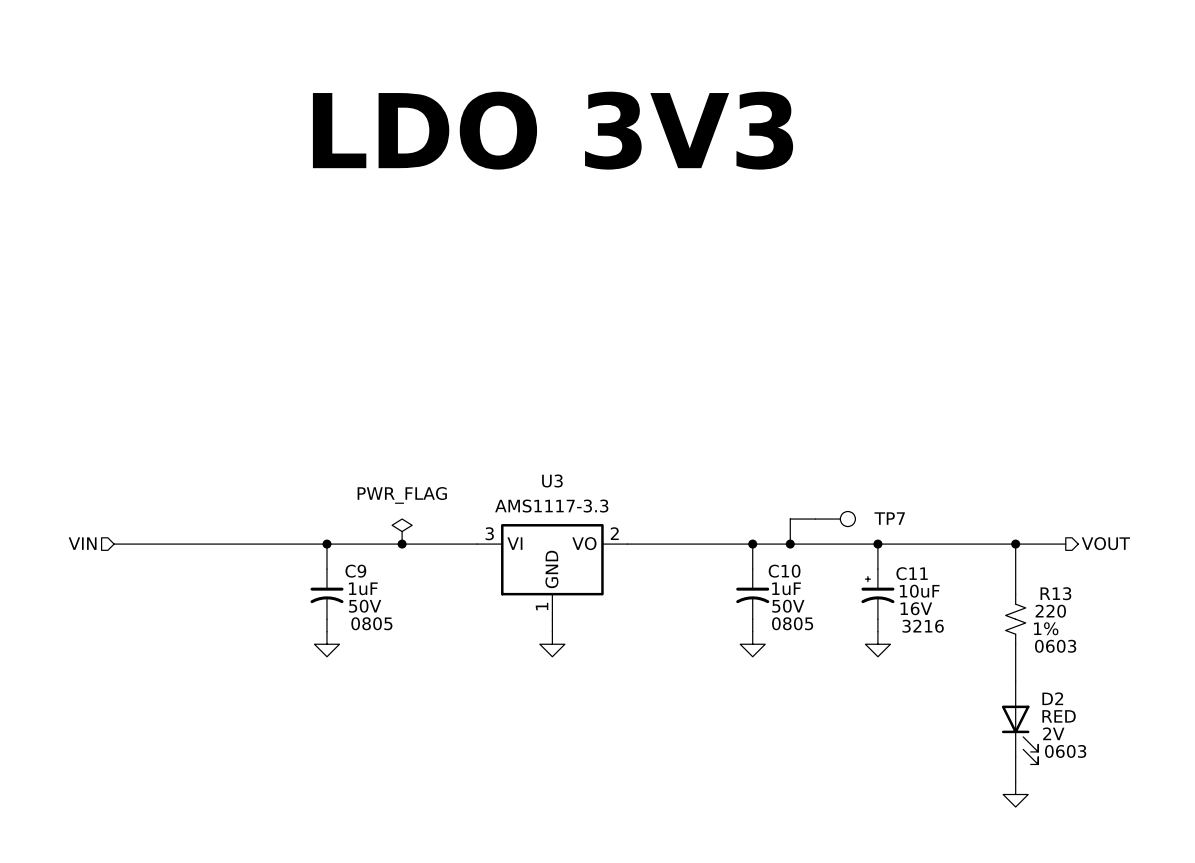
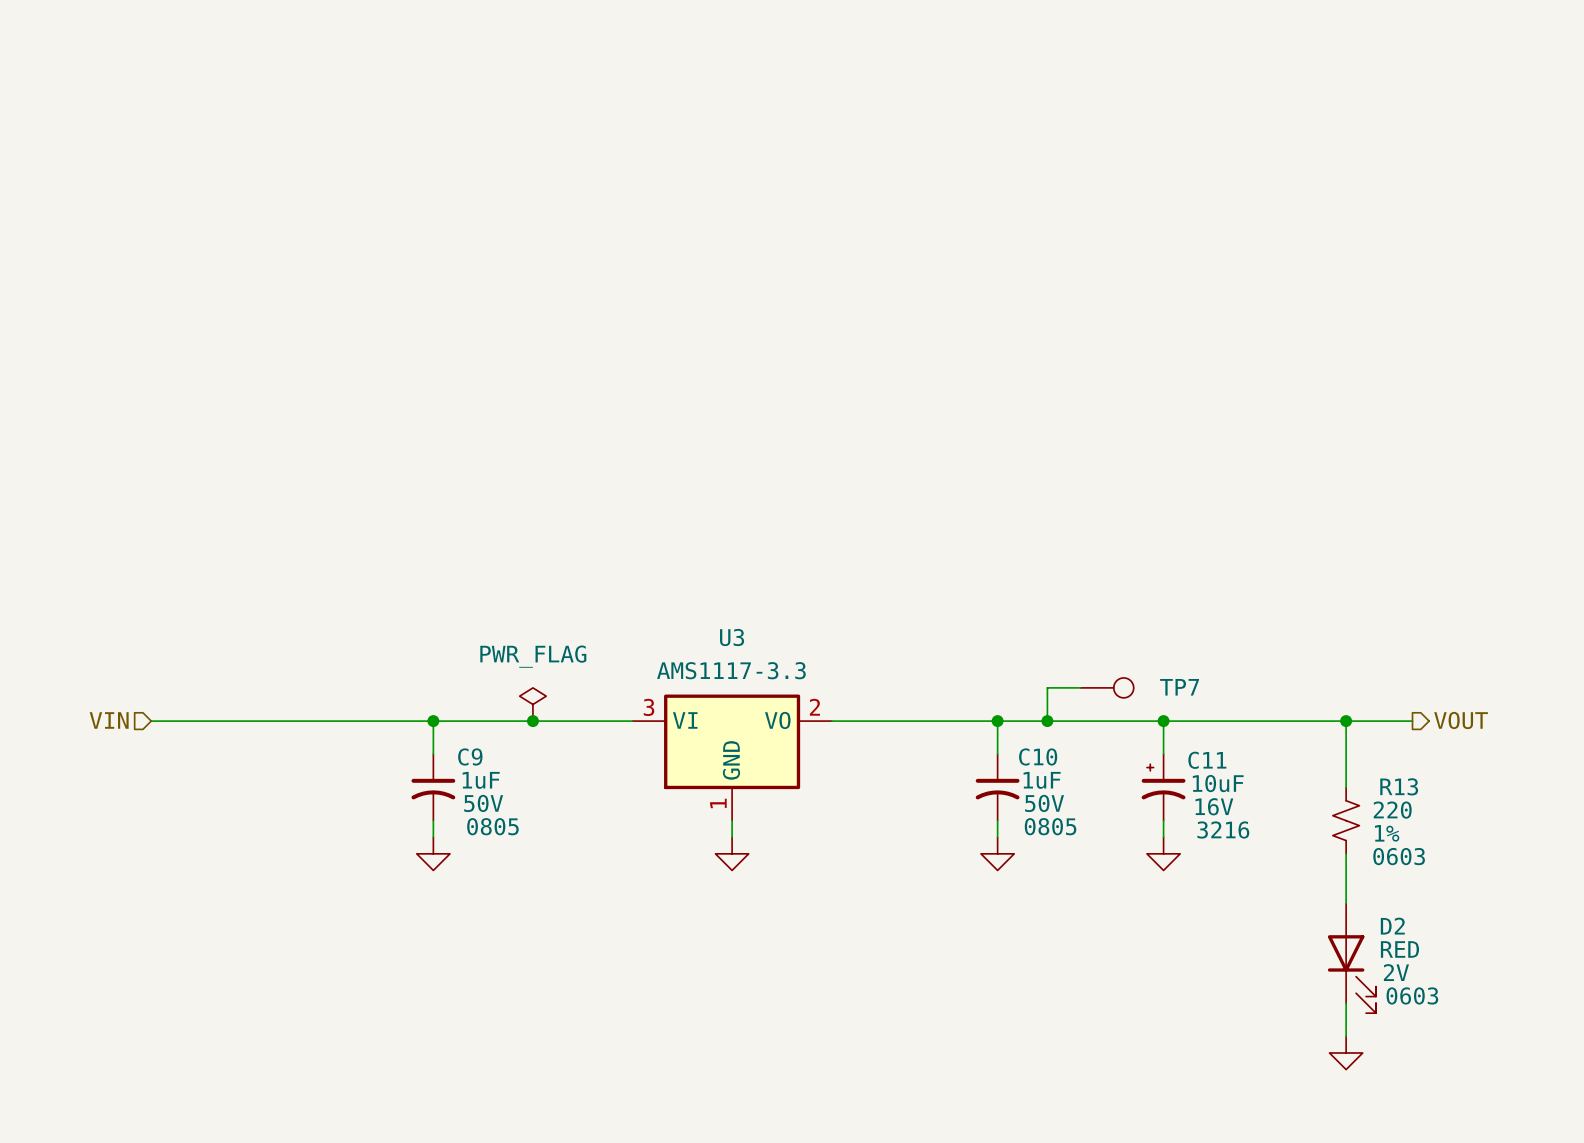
text: LDO 3V3 (553, 130) -> none

